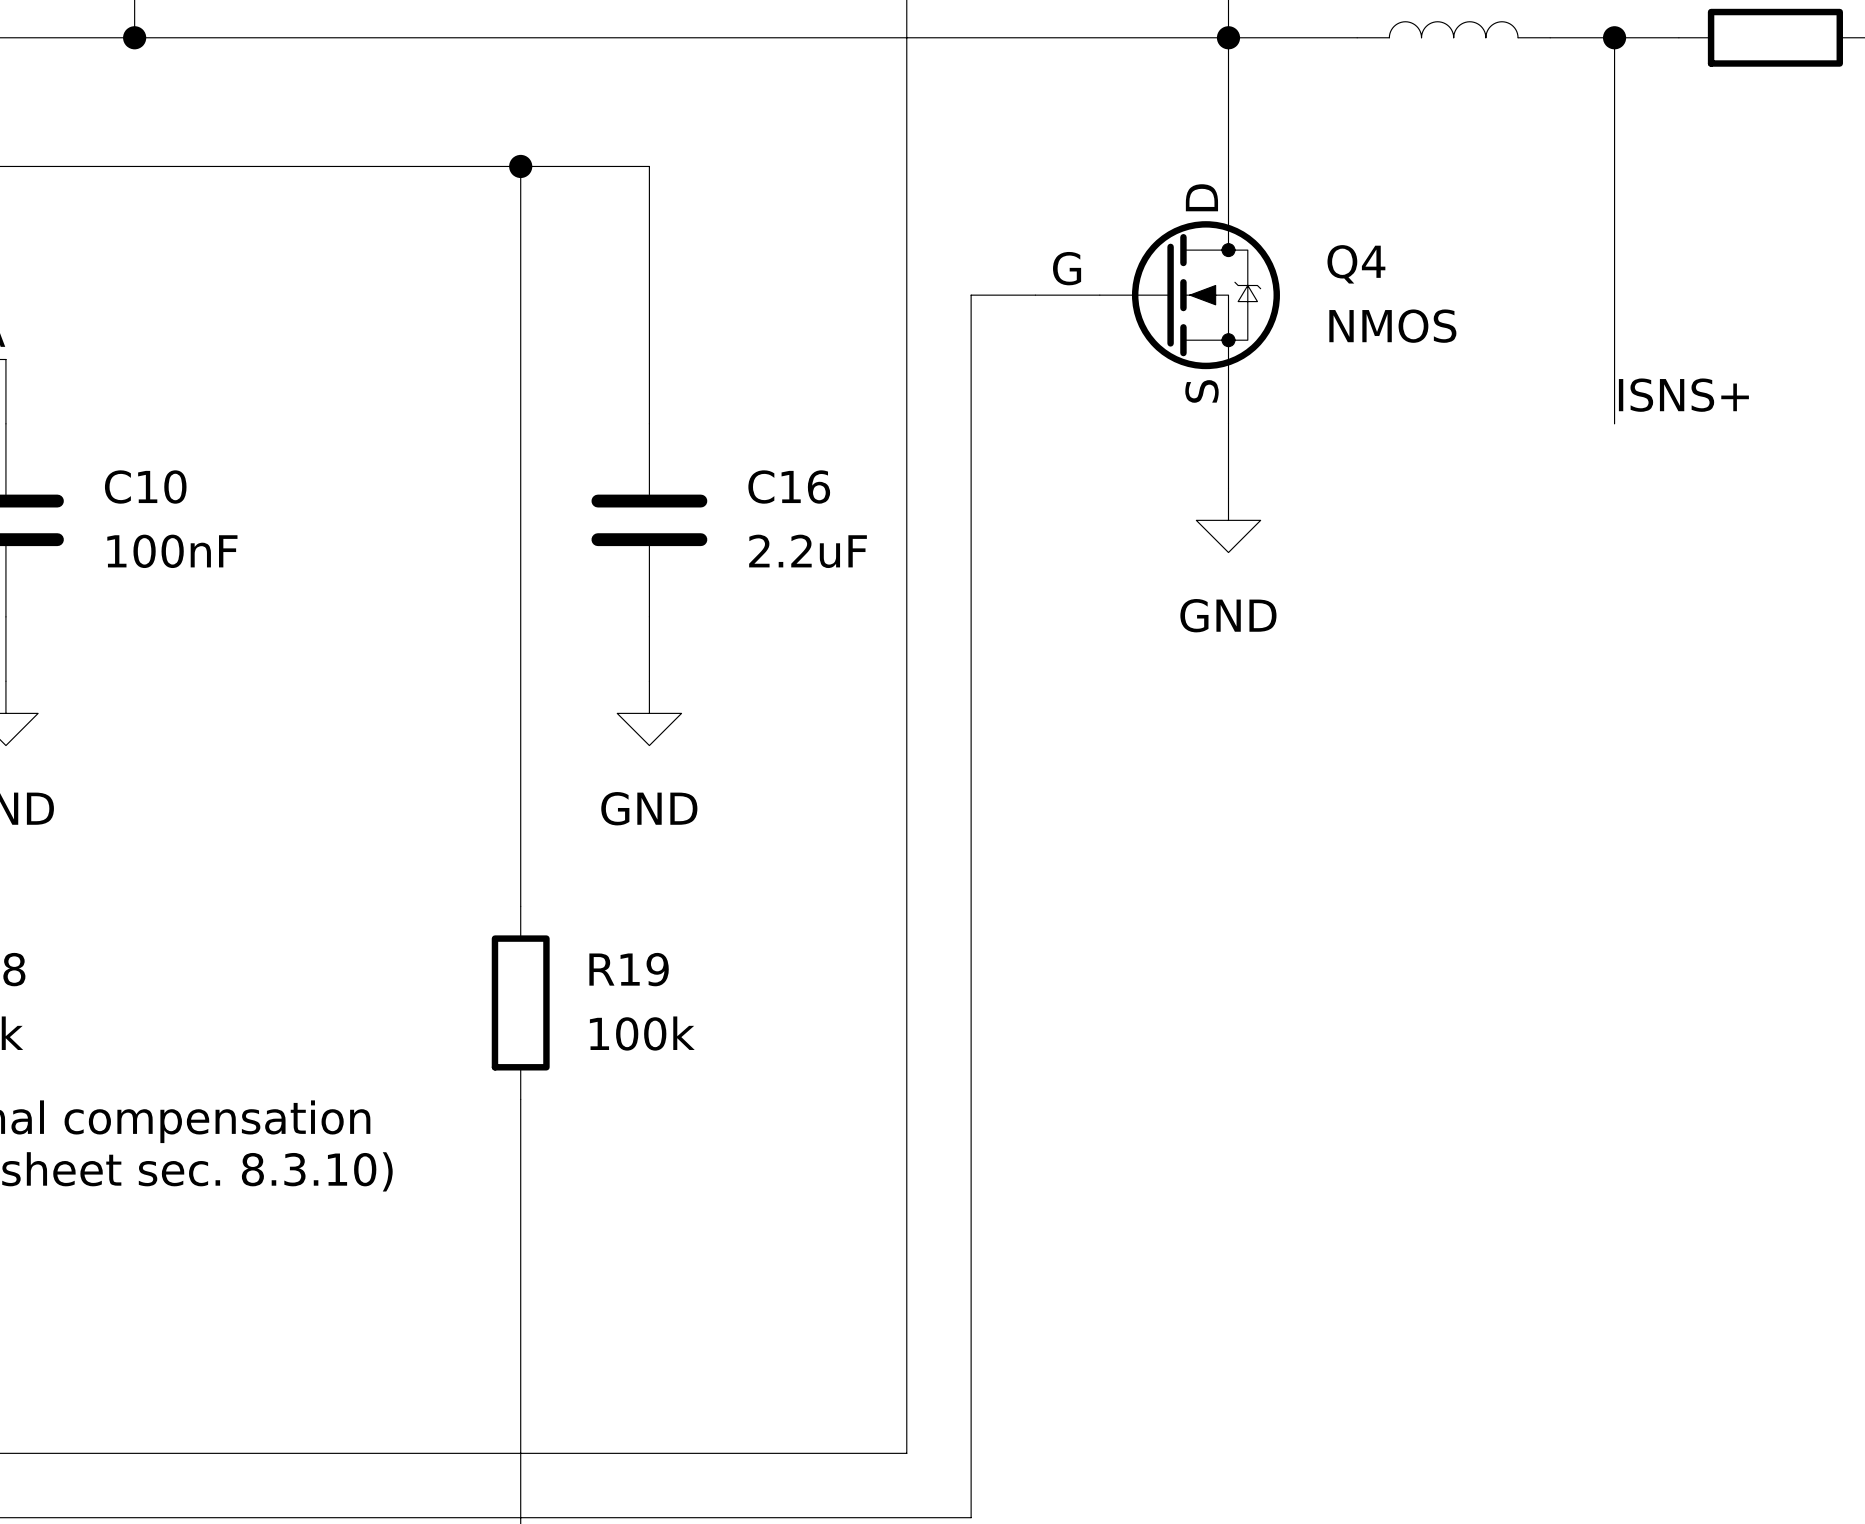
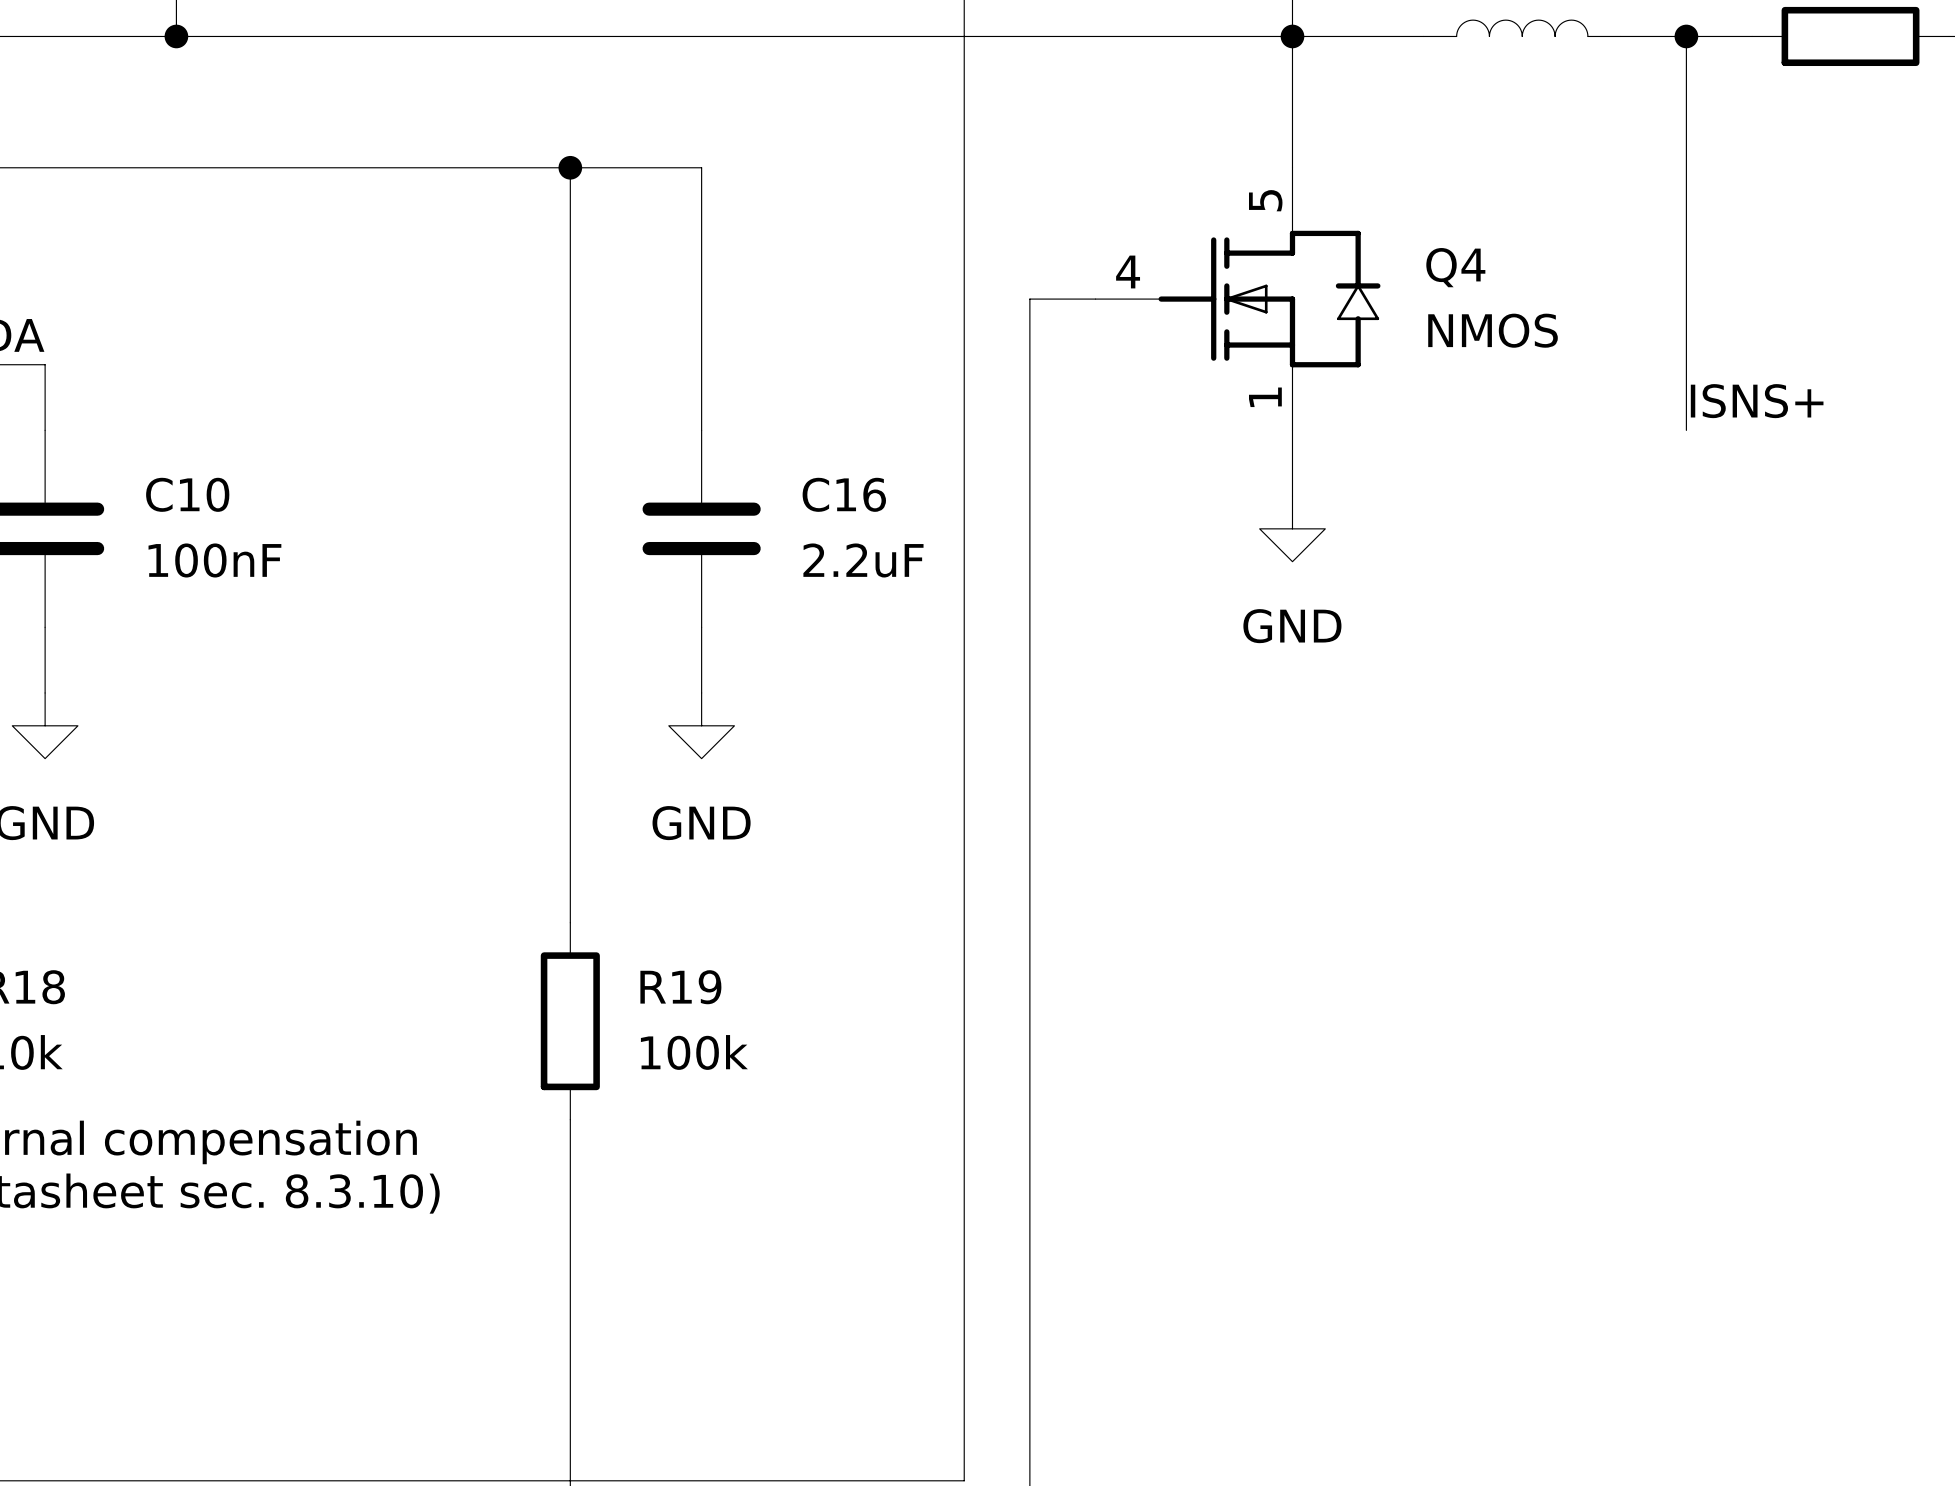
Q4 symbol: [1035, 166, 1280, 424] -> [1095, 167, 1381, 431]

